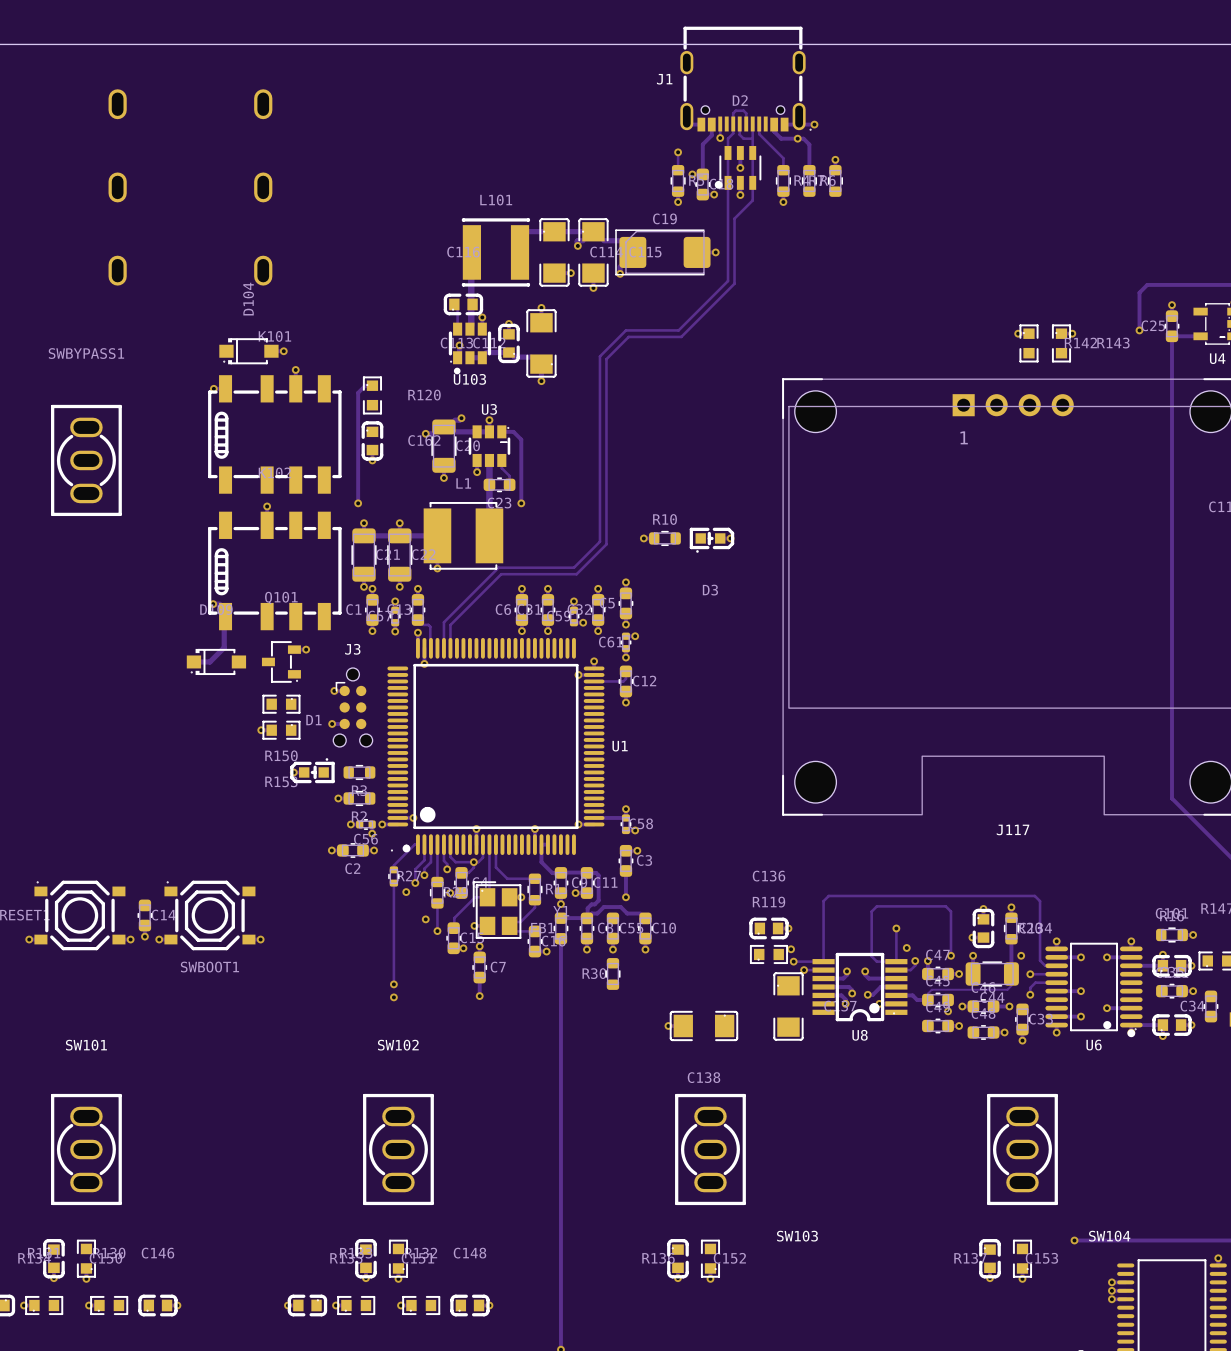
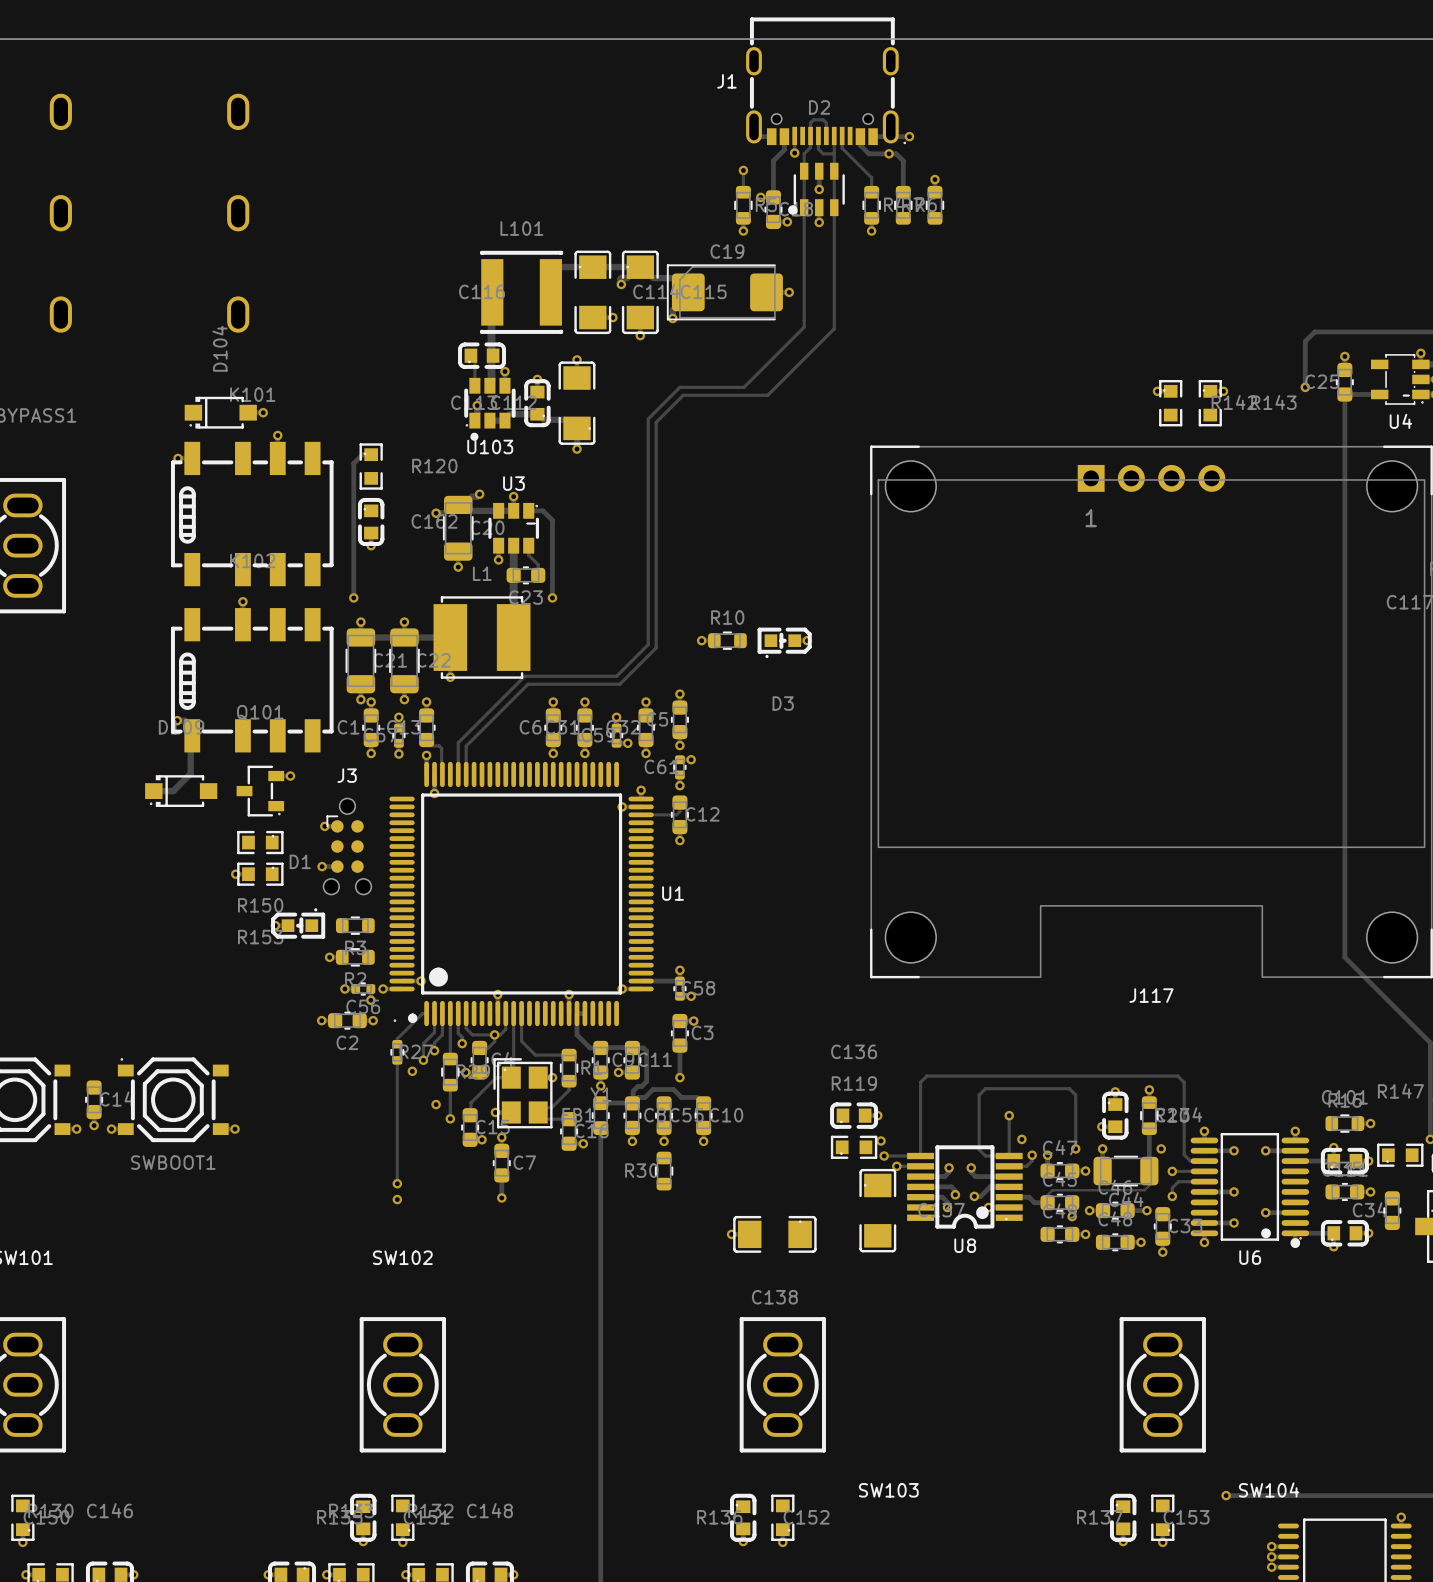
track: (752, 200) (734, 218) (734, 283) (681, 336) -> (834, 229) (834, 328) (767, 395) (747, 395)

